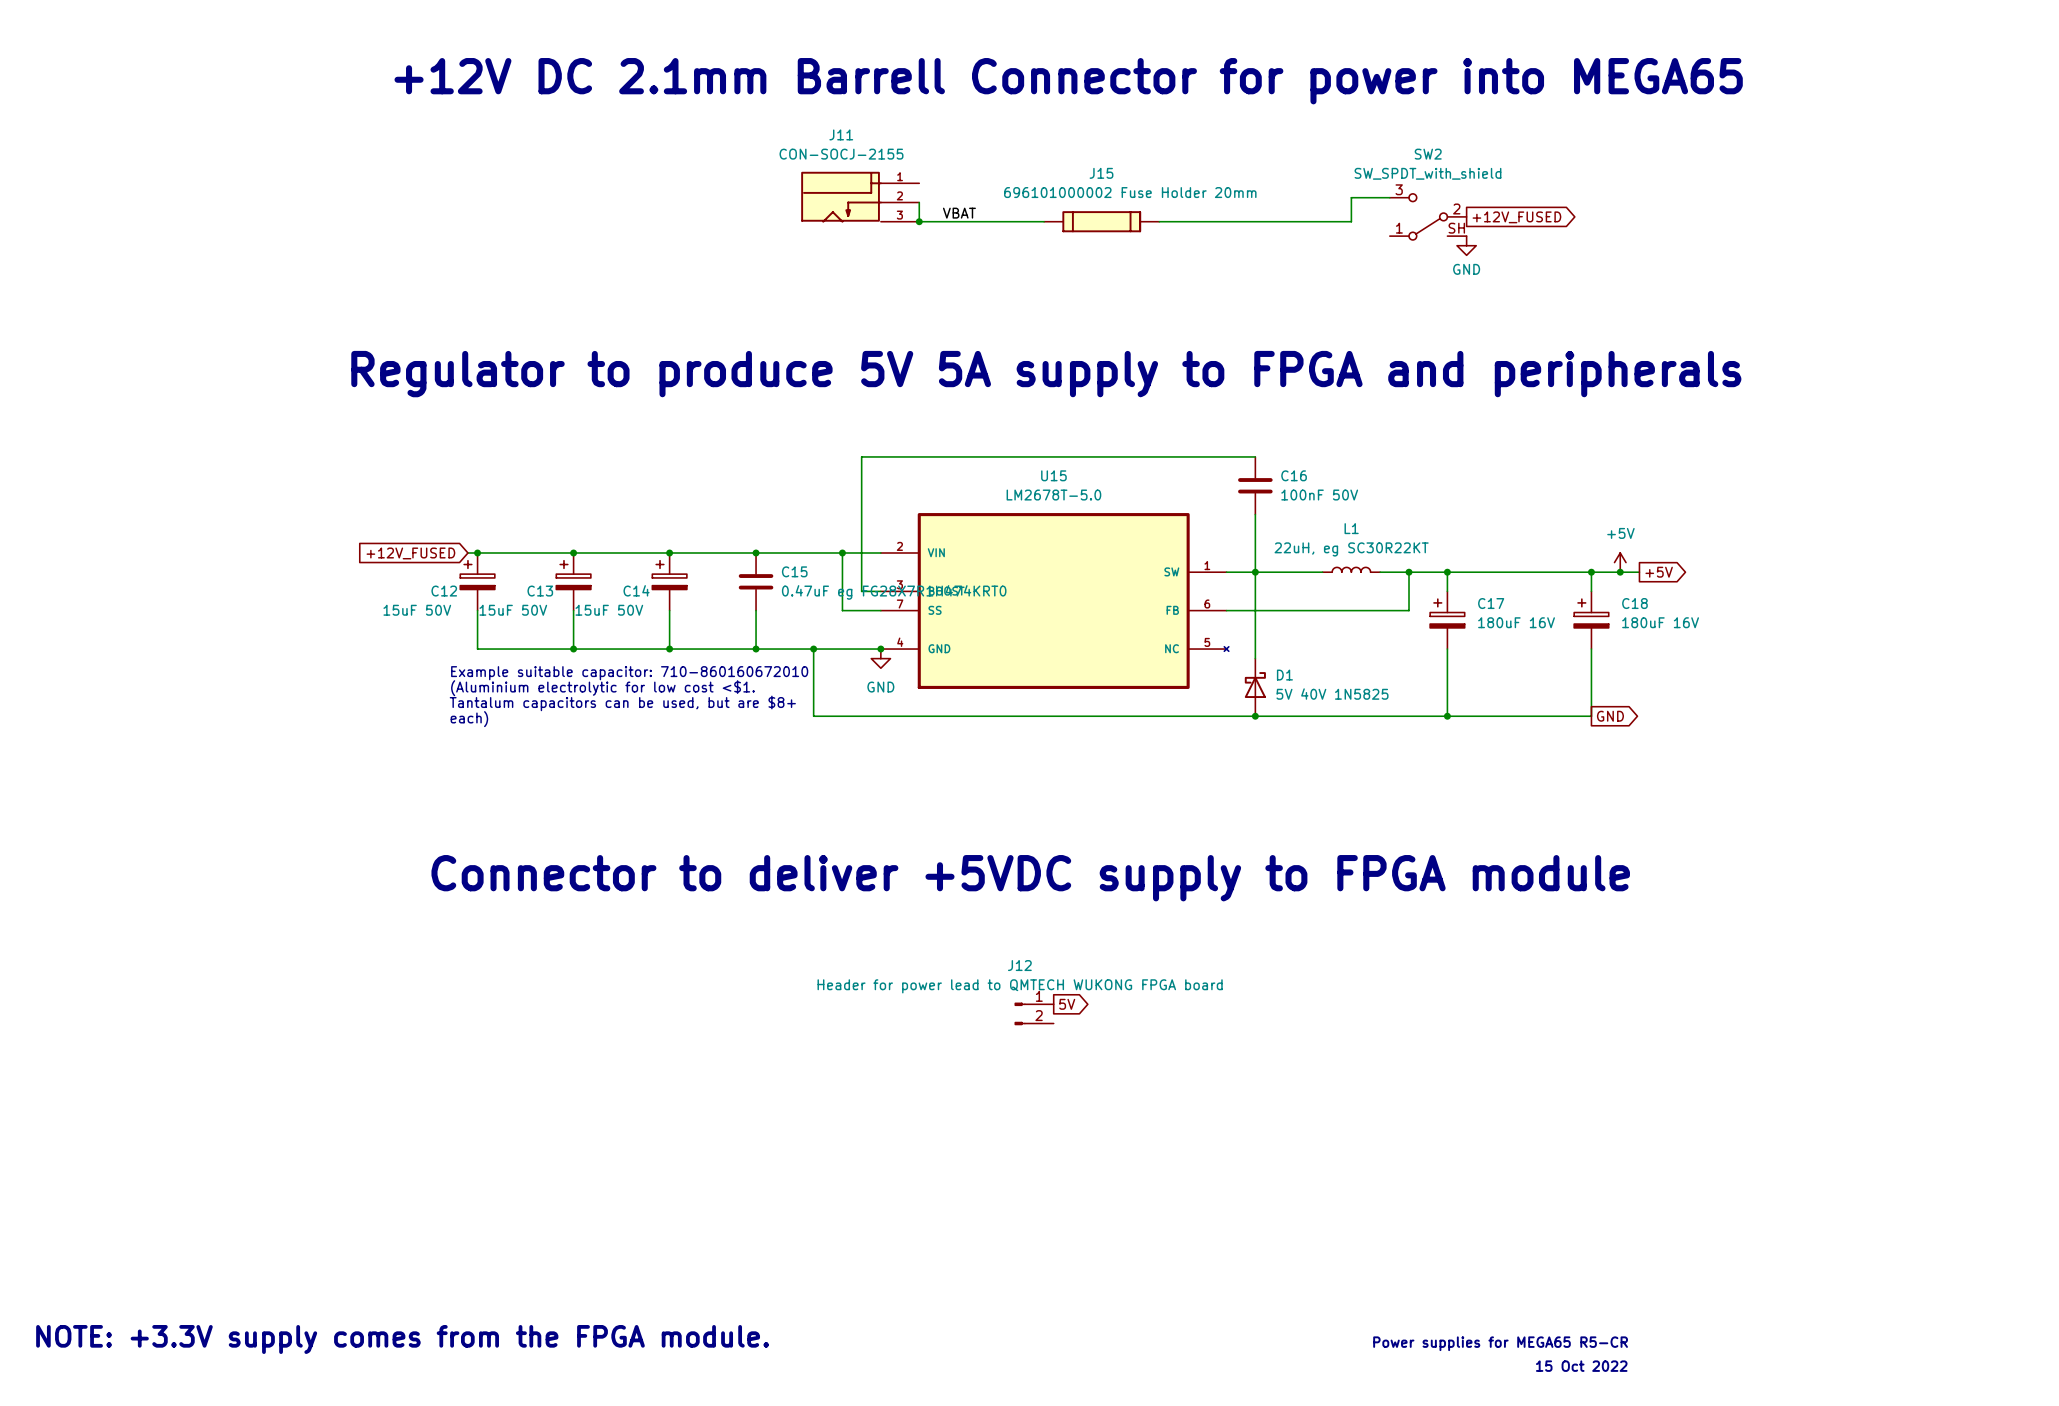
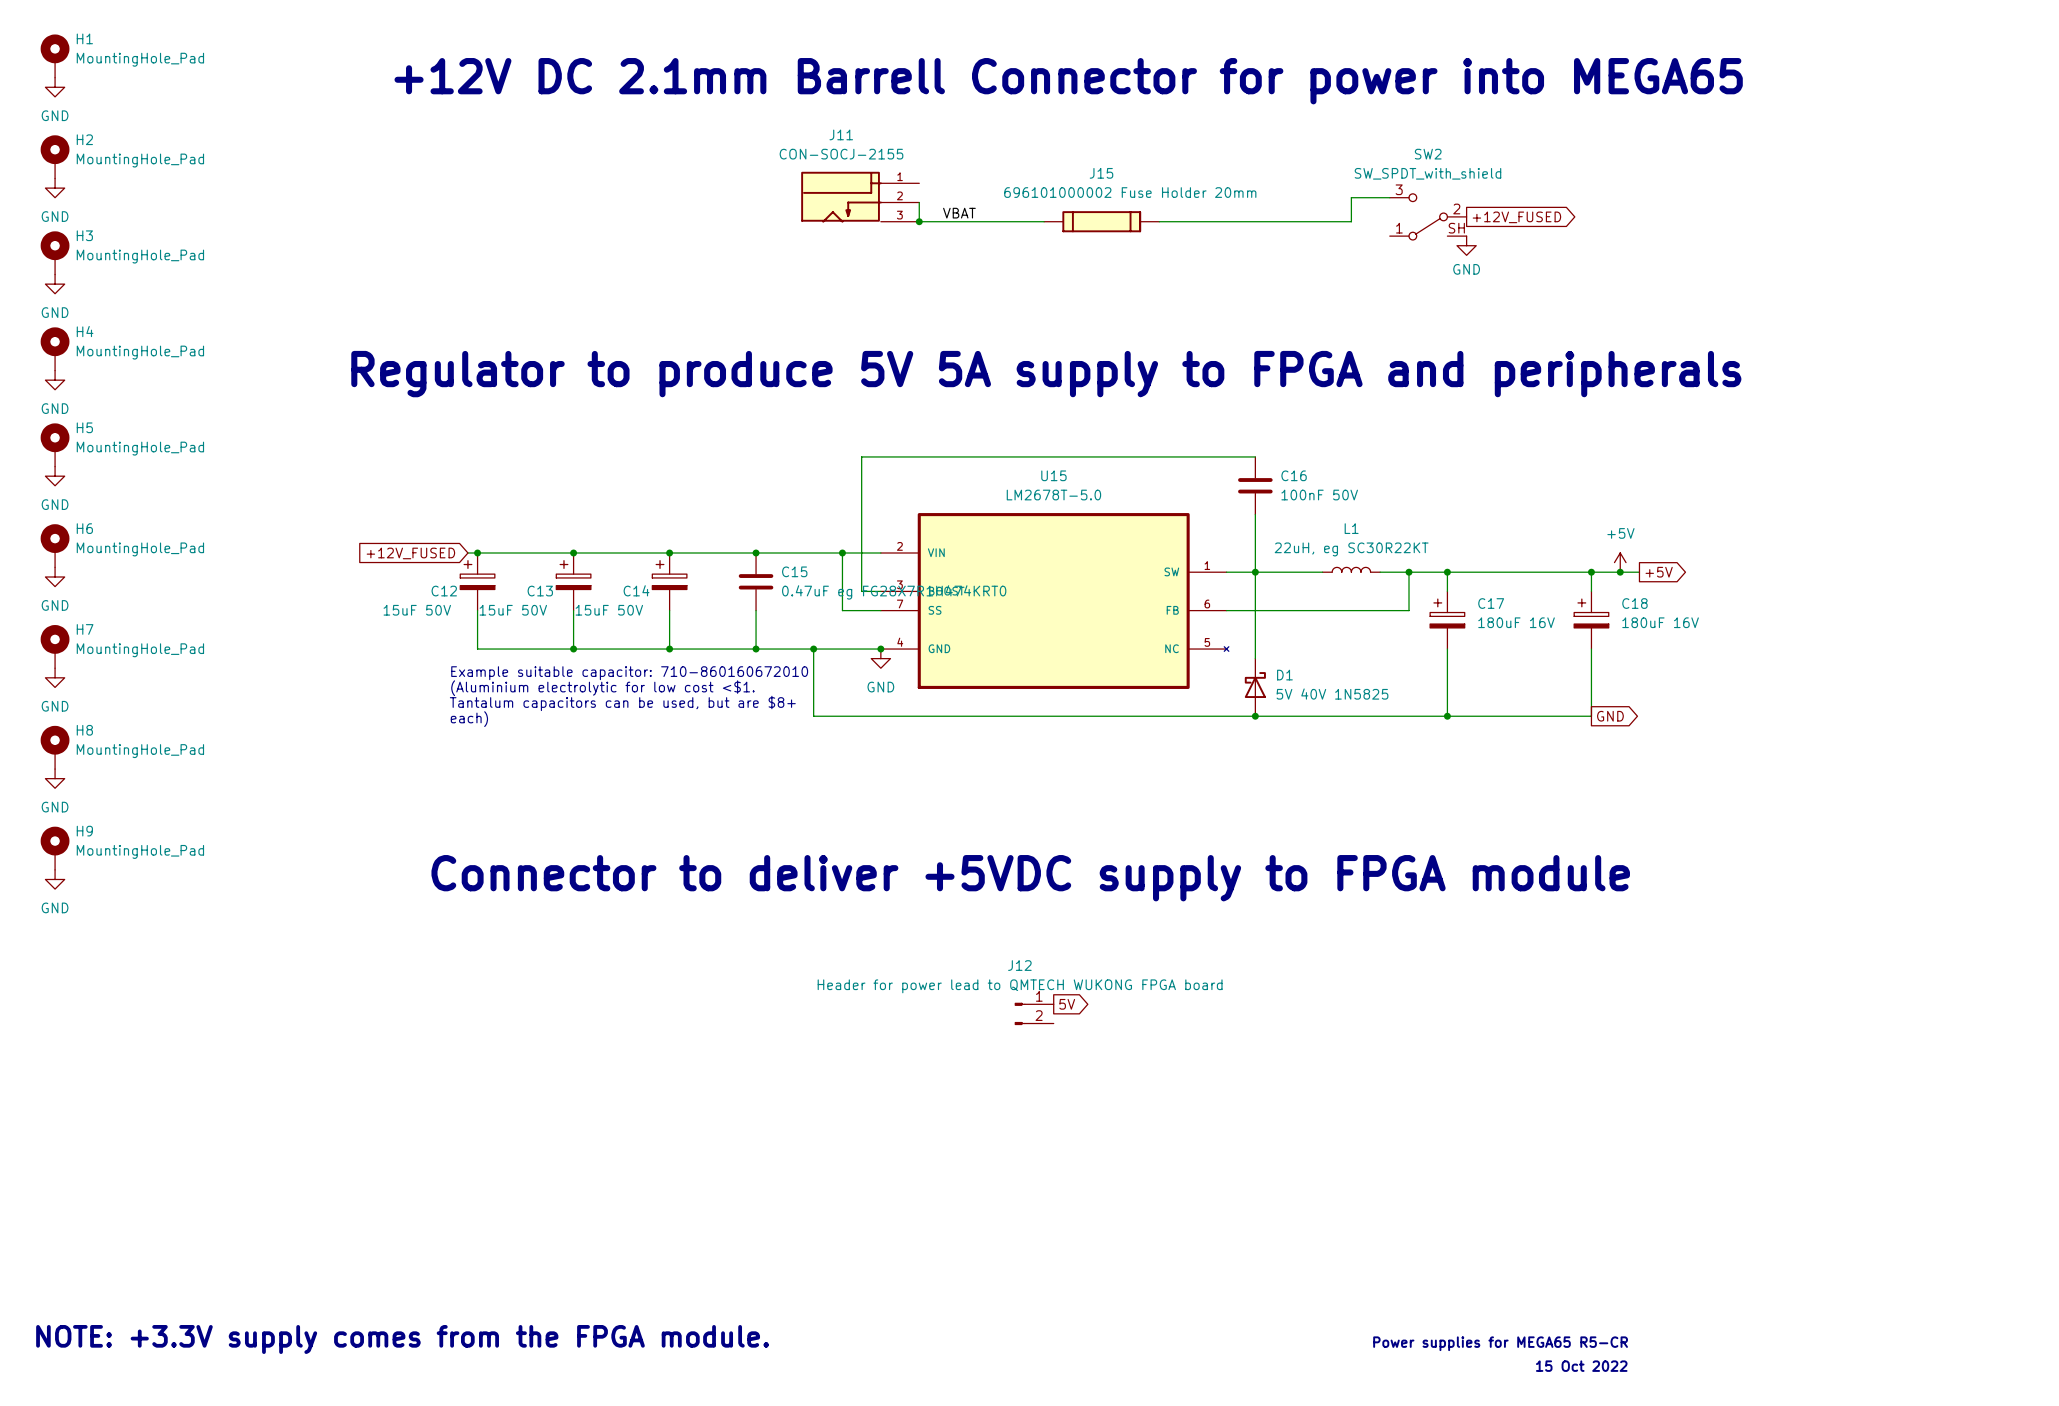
H1: none -> MountingHole_Pad (55, 56)
power symbol: none -> GND (55, 87)
H2: none -> MountingHole_Pad (55, 156)
power symbol: none -> GND (55, 188)
H3: none -> MountingHole_Pad (55, 252)
power symbol: none -> GND (55, 284)
H4: none -> MountingHole_Pad (55, 348)
power symbol: none -> GND (55, 380)
H5: none -> MountingHole_Pad (55, 444)
power symbol: none -> GND (55, 476)
H6: none -> MountingHole_Pad (55, 545)
power symbol: none -> GND (55, 577)
H7: none -> MountingHole_Pad (55, 646)
power symbol: none -> GND (55, 677)
H8: none -> MountingHole_Pad (55, 747)
power symbol: none -> GND (55, 778)
H9: none -> MountingHole_Pad (55, 848)
power symbol: none -> GND (55, 879)

